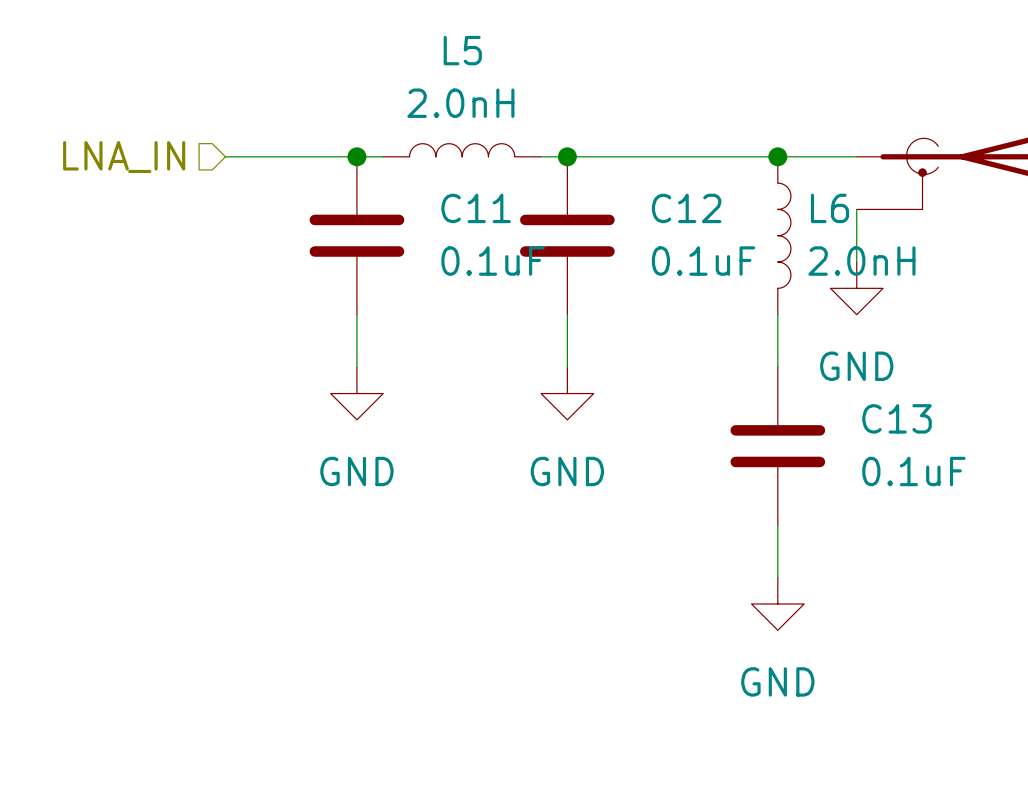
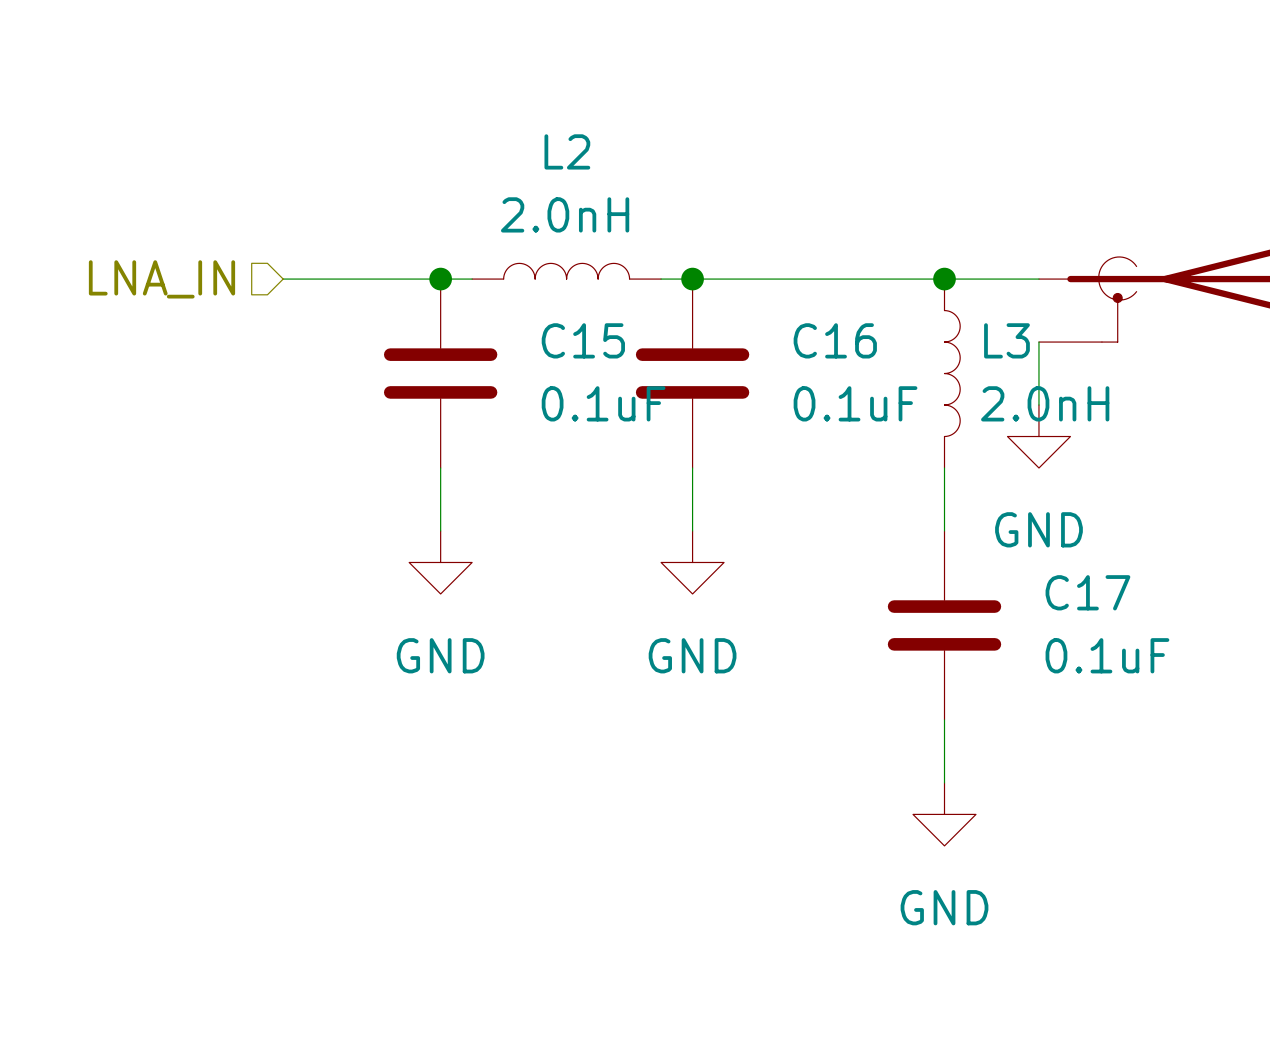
L5 name: L5 (462, 50) -> L2 (567, 151)
C11 name: C11 (476, 208) -> C15 (583, 340)
C12 name: C12 (686, 208) -> C16 (835, 340)
L6 name: L6 (830, 208) -> L3 (1006, 340)
C13 name: C13 (897, 418) -> C17 (1087, 592)

